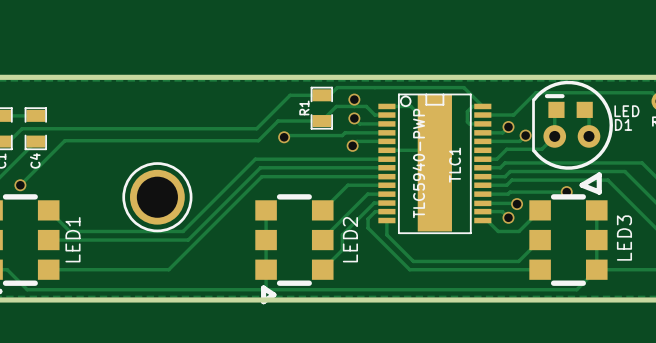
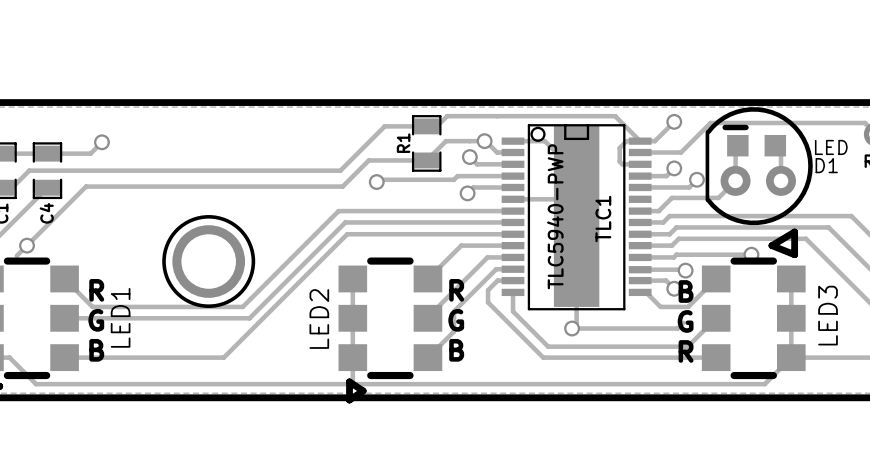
track: none -> (674, 121) (654, 141) (640, 141)
via: none -> (674, 121)
via position: (354, 99) -> (484, 141)
track: none -> (101, 142) (90, 153) (47, 153)
via: none -> (101, 142)
track: none -> (576, 216) (576, 323) (572, 328) (677, 328) (683, 322)
track: none -> (27, 245) (16, 255)
text: none -> R (96, 290)
text: none -> R (456, 290)
text: none -> B (686, 291)
LED1 name position: LED1 (72, 239) -> LED1 (120, 317)
LED2 name position: LED2 (350, 239) -> LED2 (319, 319)
text: none -> G (96, 320)
text: none -> G (456, 320)
text: none -> G (685, 321)
via: none -> (572, 328)
text: none -> B (96, 350)
text: none -> B (456, 350)
text: none -> R (686, 351)

